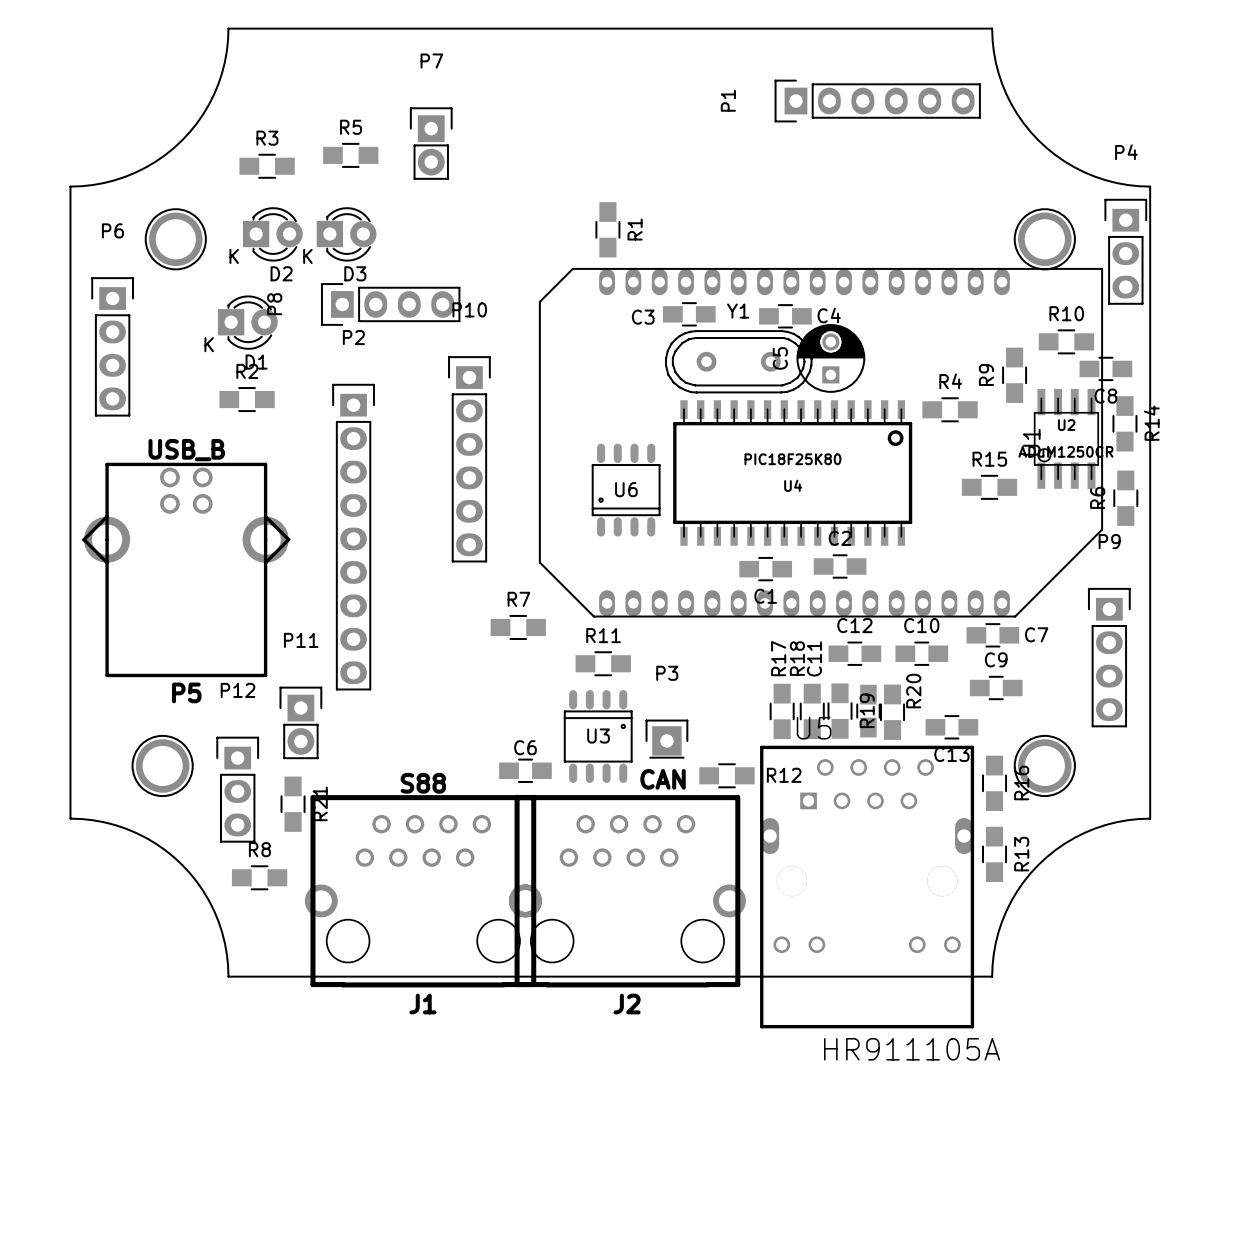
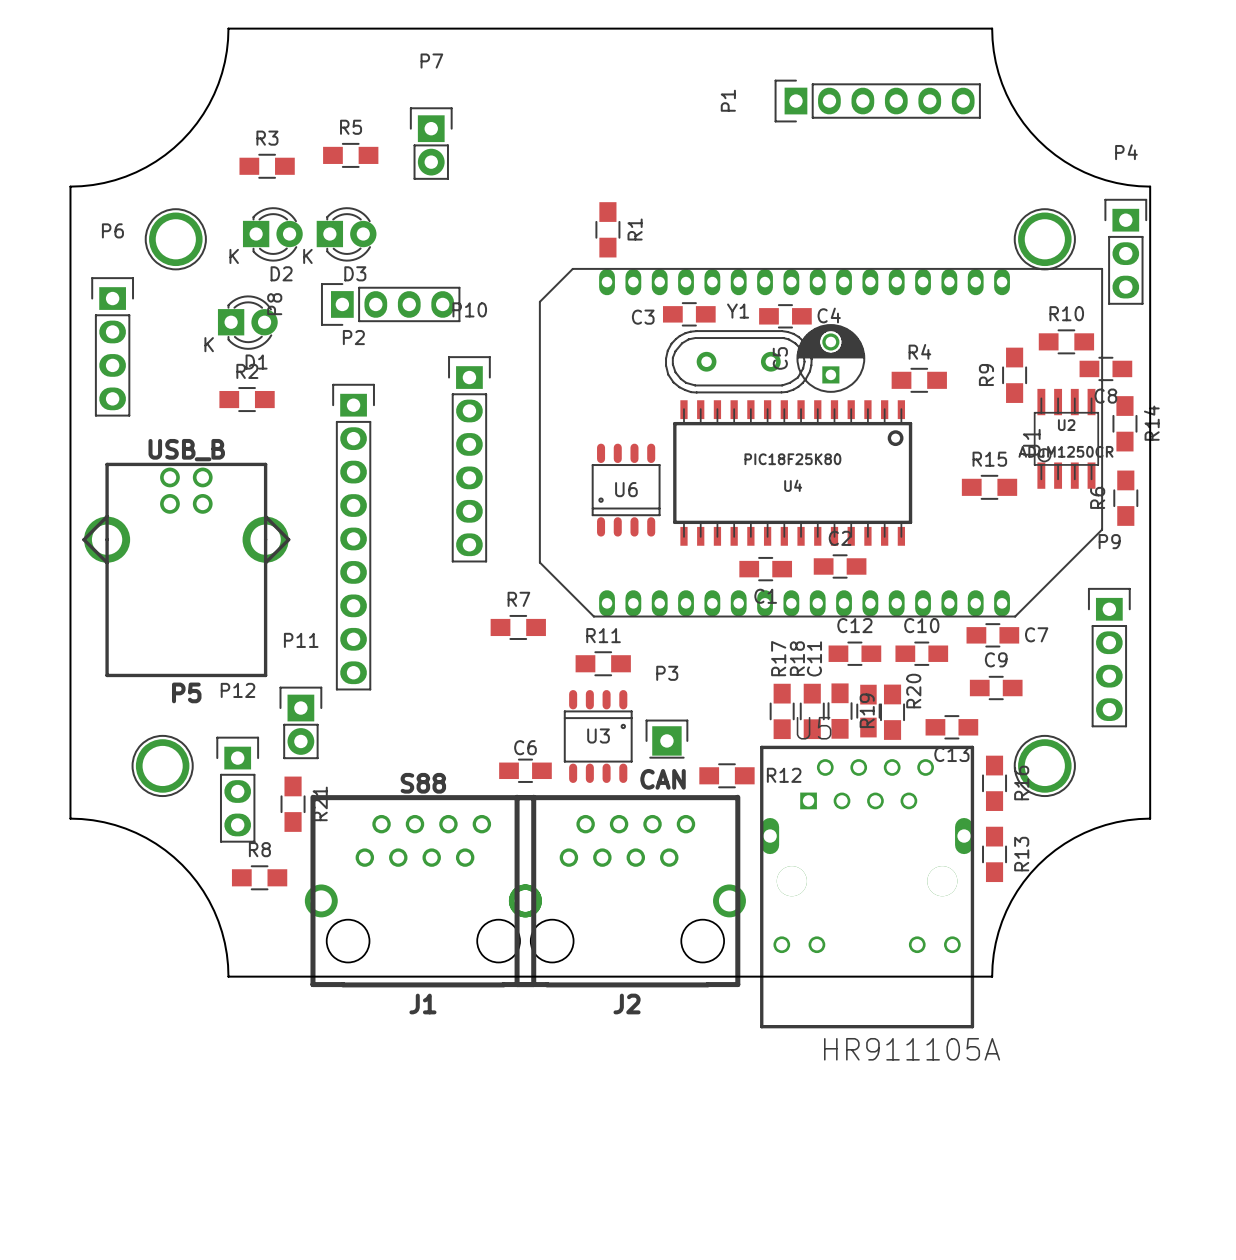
R4 position: (950, 409) -> (919, 380)

